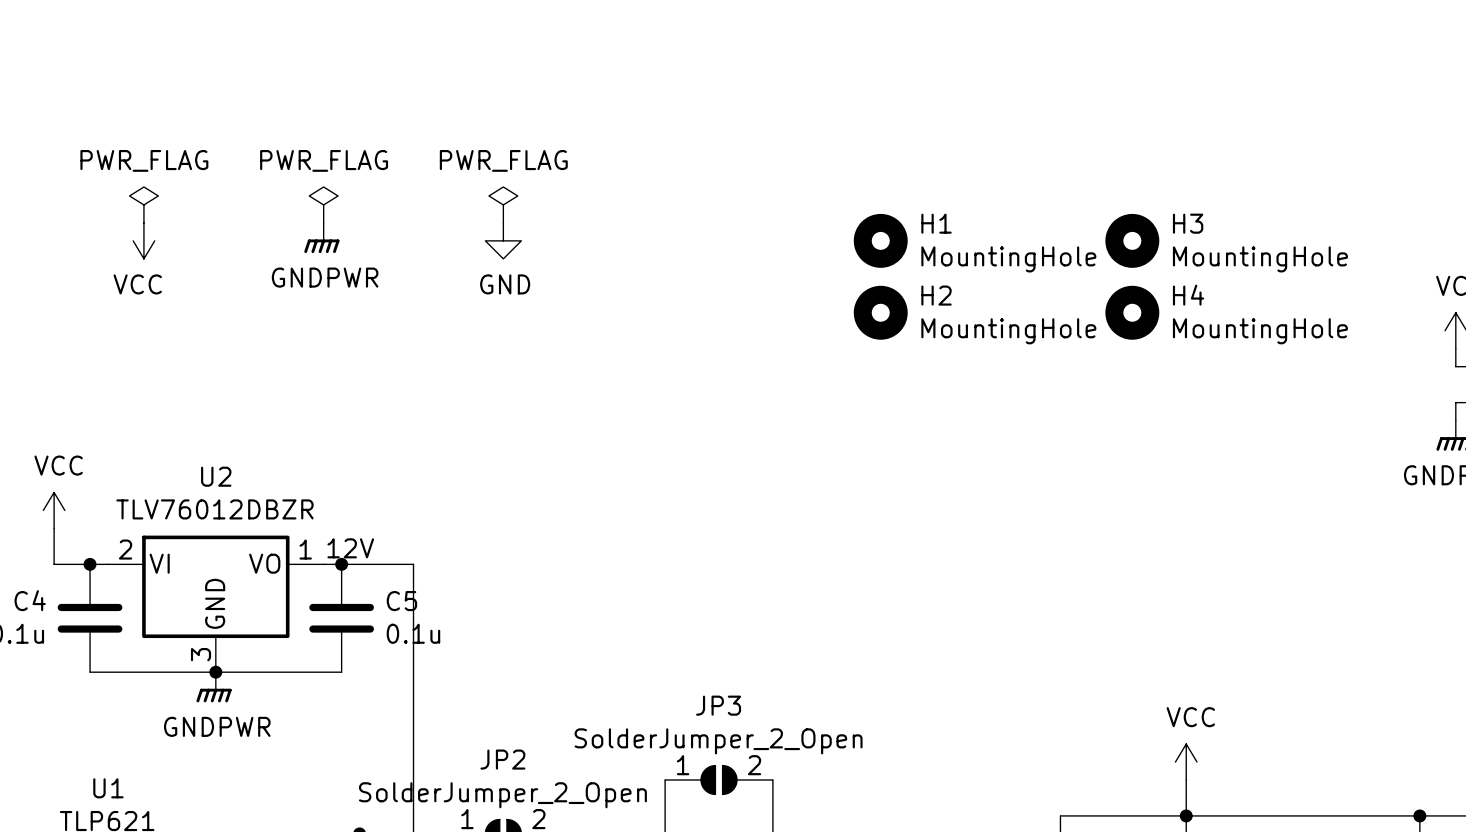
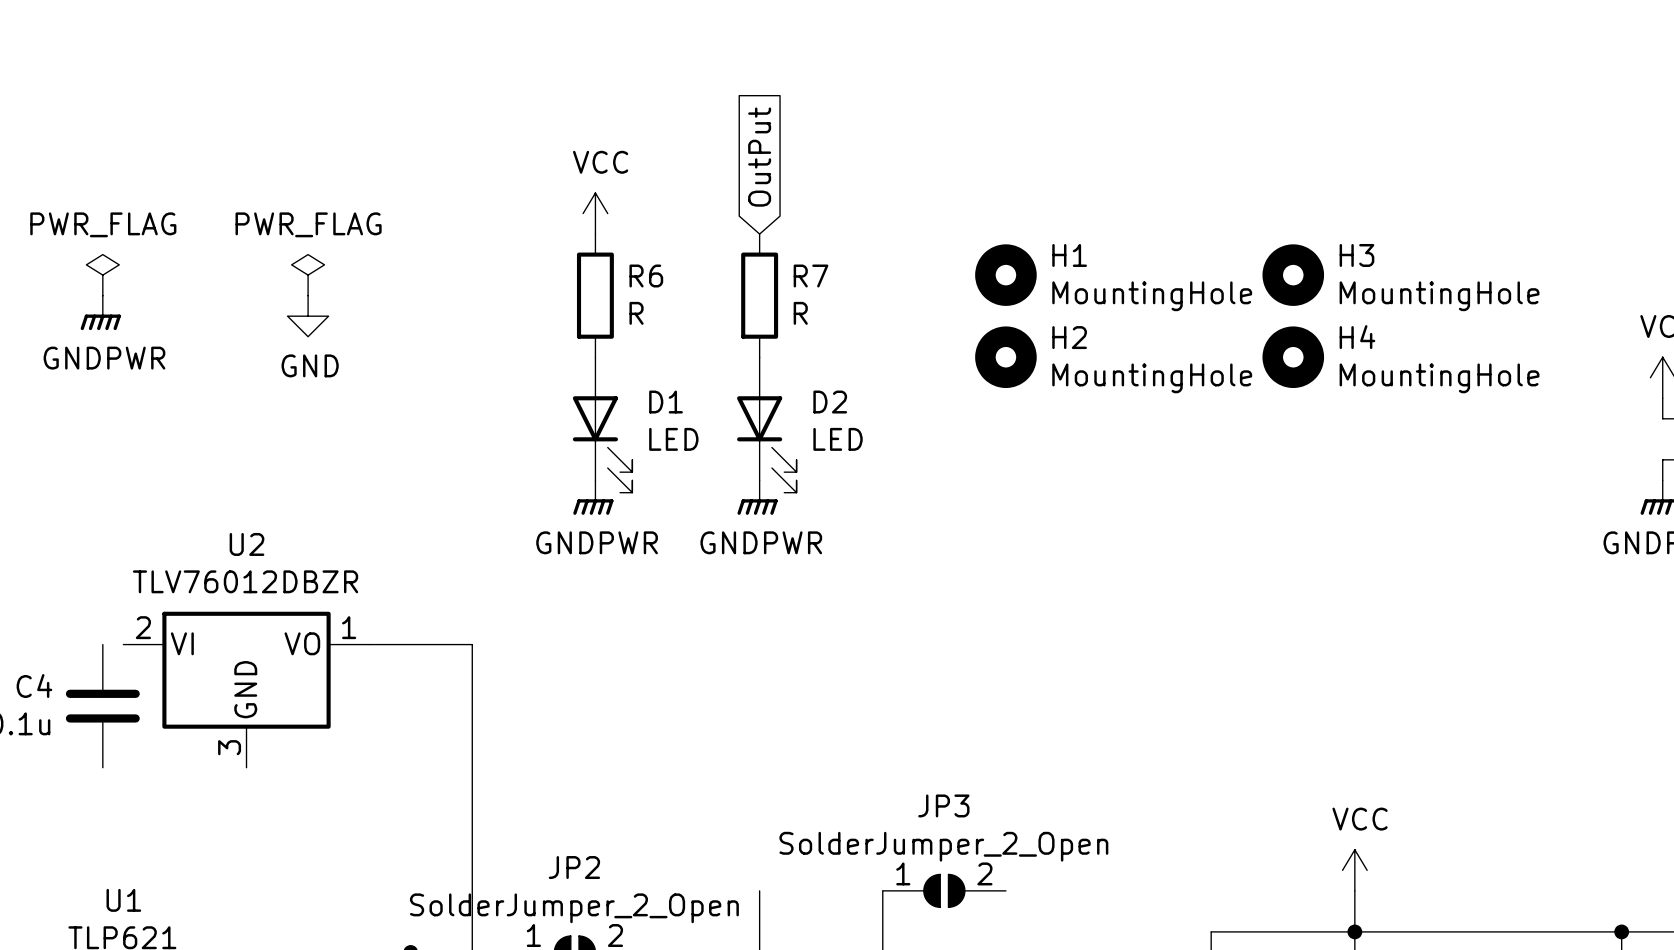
global label: none -> OutPut (759, 157)
power symbol: none -> VCC (595, 213)
power symbol position: PWR_FLAG (143, 204) -> PWR_FLAG (102, 275)
power symbol position: PWR_FLAG (323, 204) -> PWR_FLAG (308, 275)
power symbol: PWR_FLAG (503, 204) -> none
power symbol: GNDPWR (321, 238) -> none
power symbol: VCC (143, 240) -> none
power symbol position: GND (503, 240) -> GND (308, 316)
R6: none -> R (595, 295)
R7: none -> R (759, 295)
power symbol: none -> GNDPWR (100, 312)
D1: none -> LED (602, 424)
D2: none -> LED (766, 424)
power symbol: none -> GNDPWR (593, 497)
power symbol: none -> GNDPWR (757, 497)
power symbol: VCC (54, 510) -> none
wire: (54, 528) (54, 564) (108, 564) -> none
label: 12V (350, 548) -> none
junction: (90, 564) -> none
junction: (341, 564) -> none
C5: 0.1u (341, 618) -> none
wire: (90, 672) (341, 672) -> none
junction: (215, 672) -> none
power symbol: GNDPWR (214, 687) -> none
JP3 position: (719, 780) -> (944, 890)

